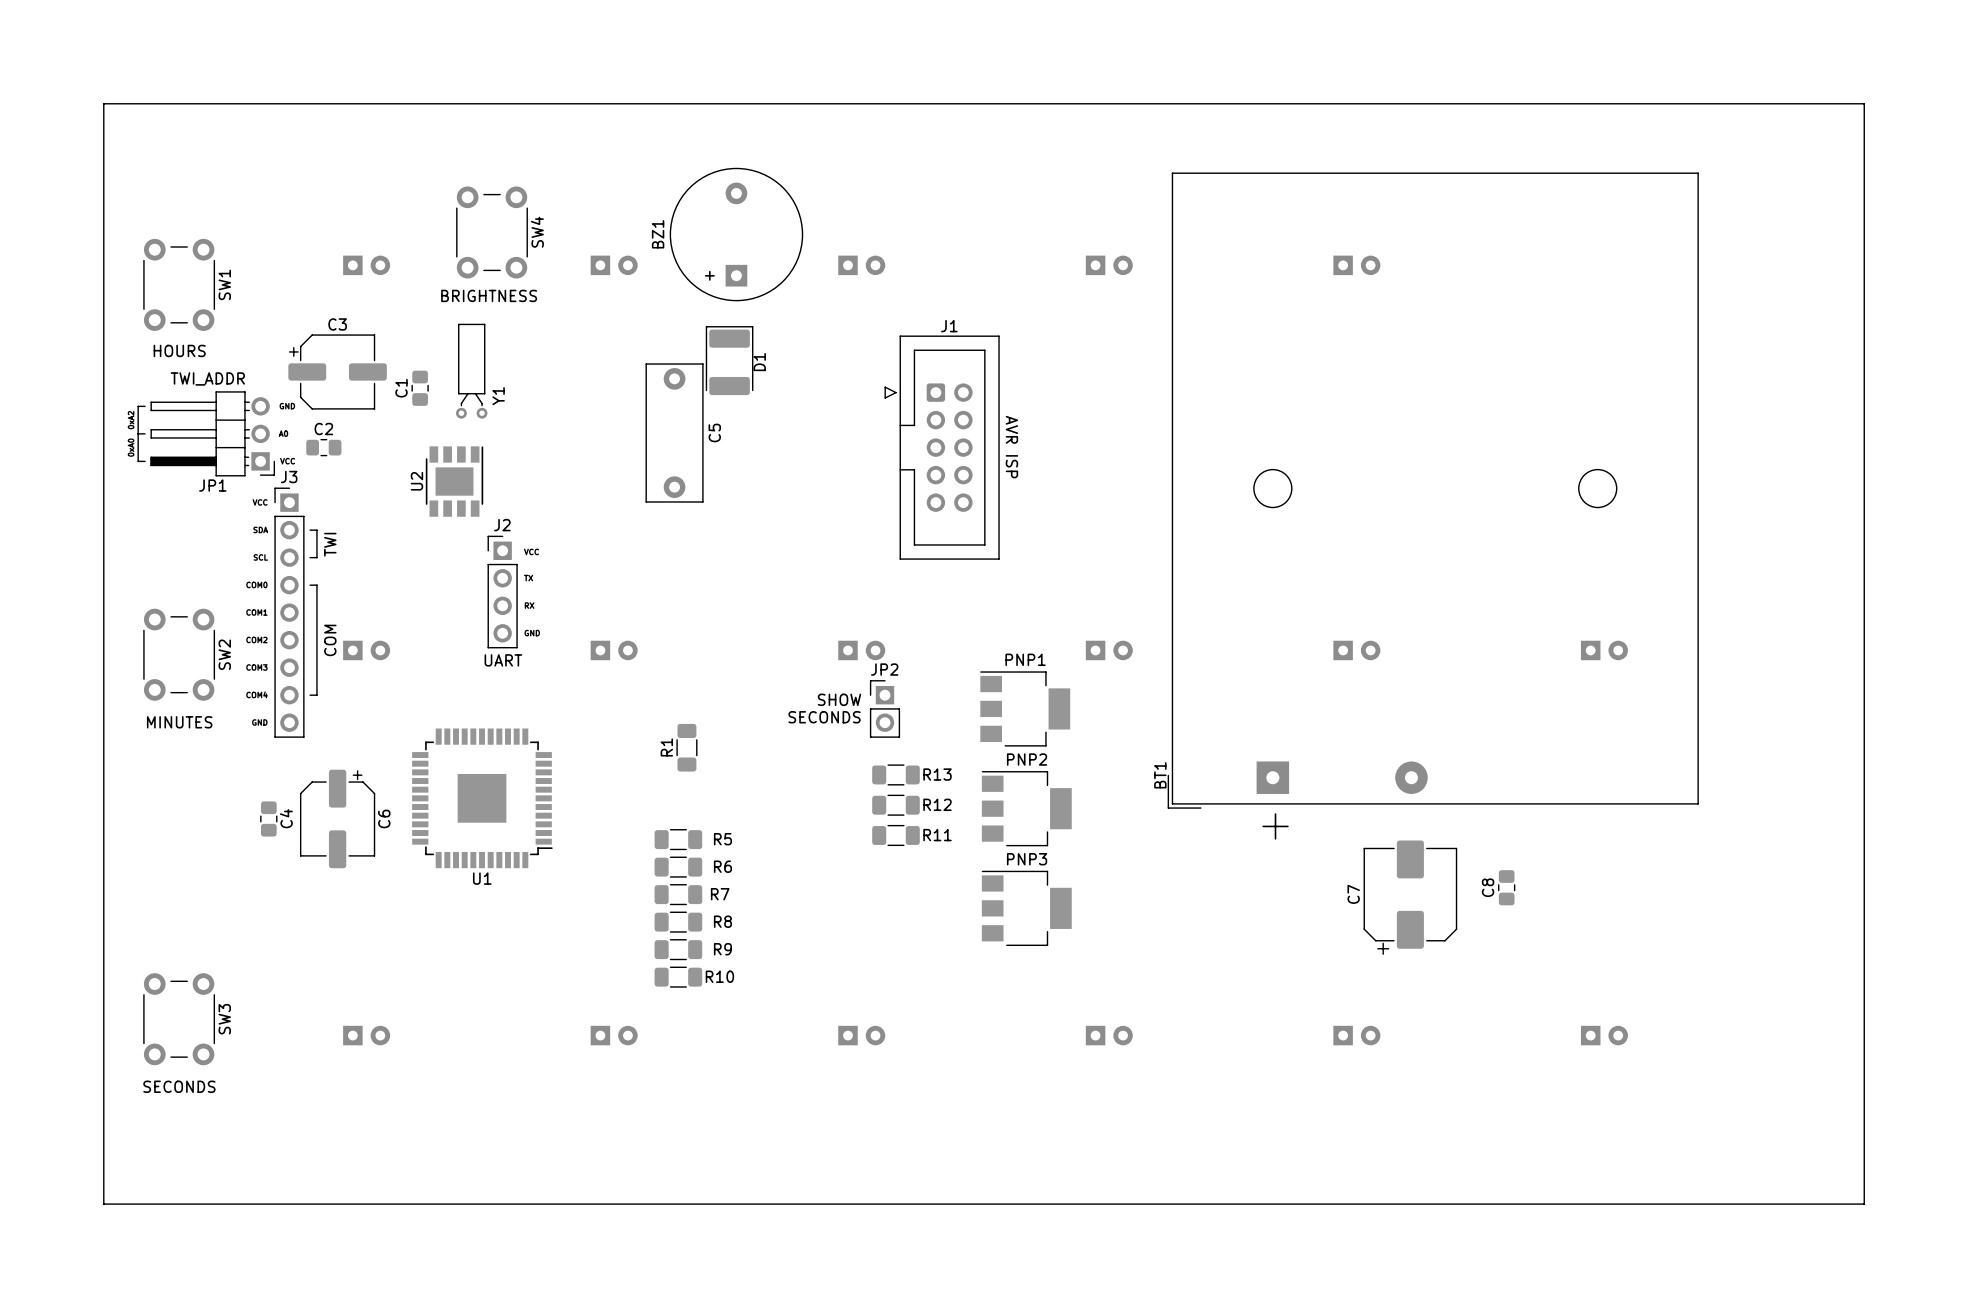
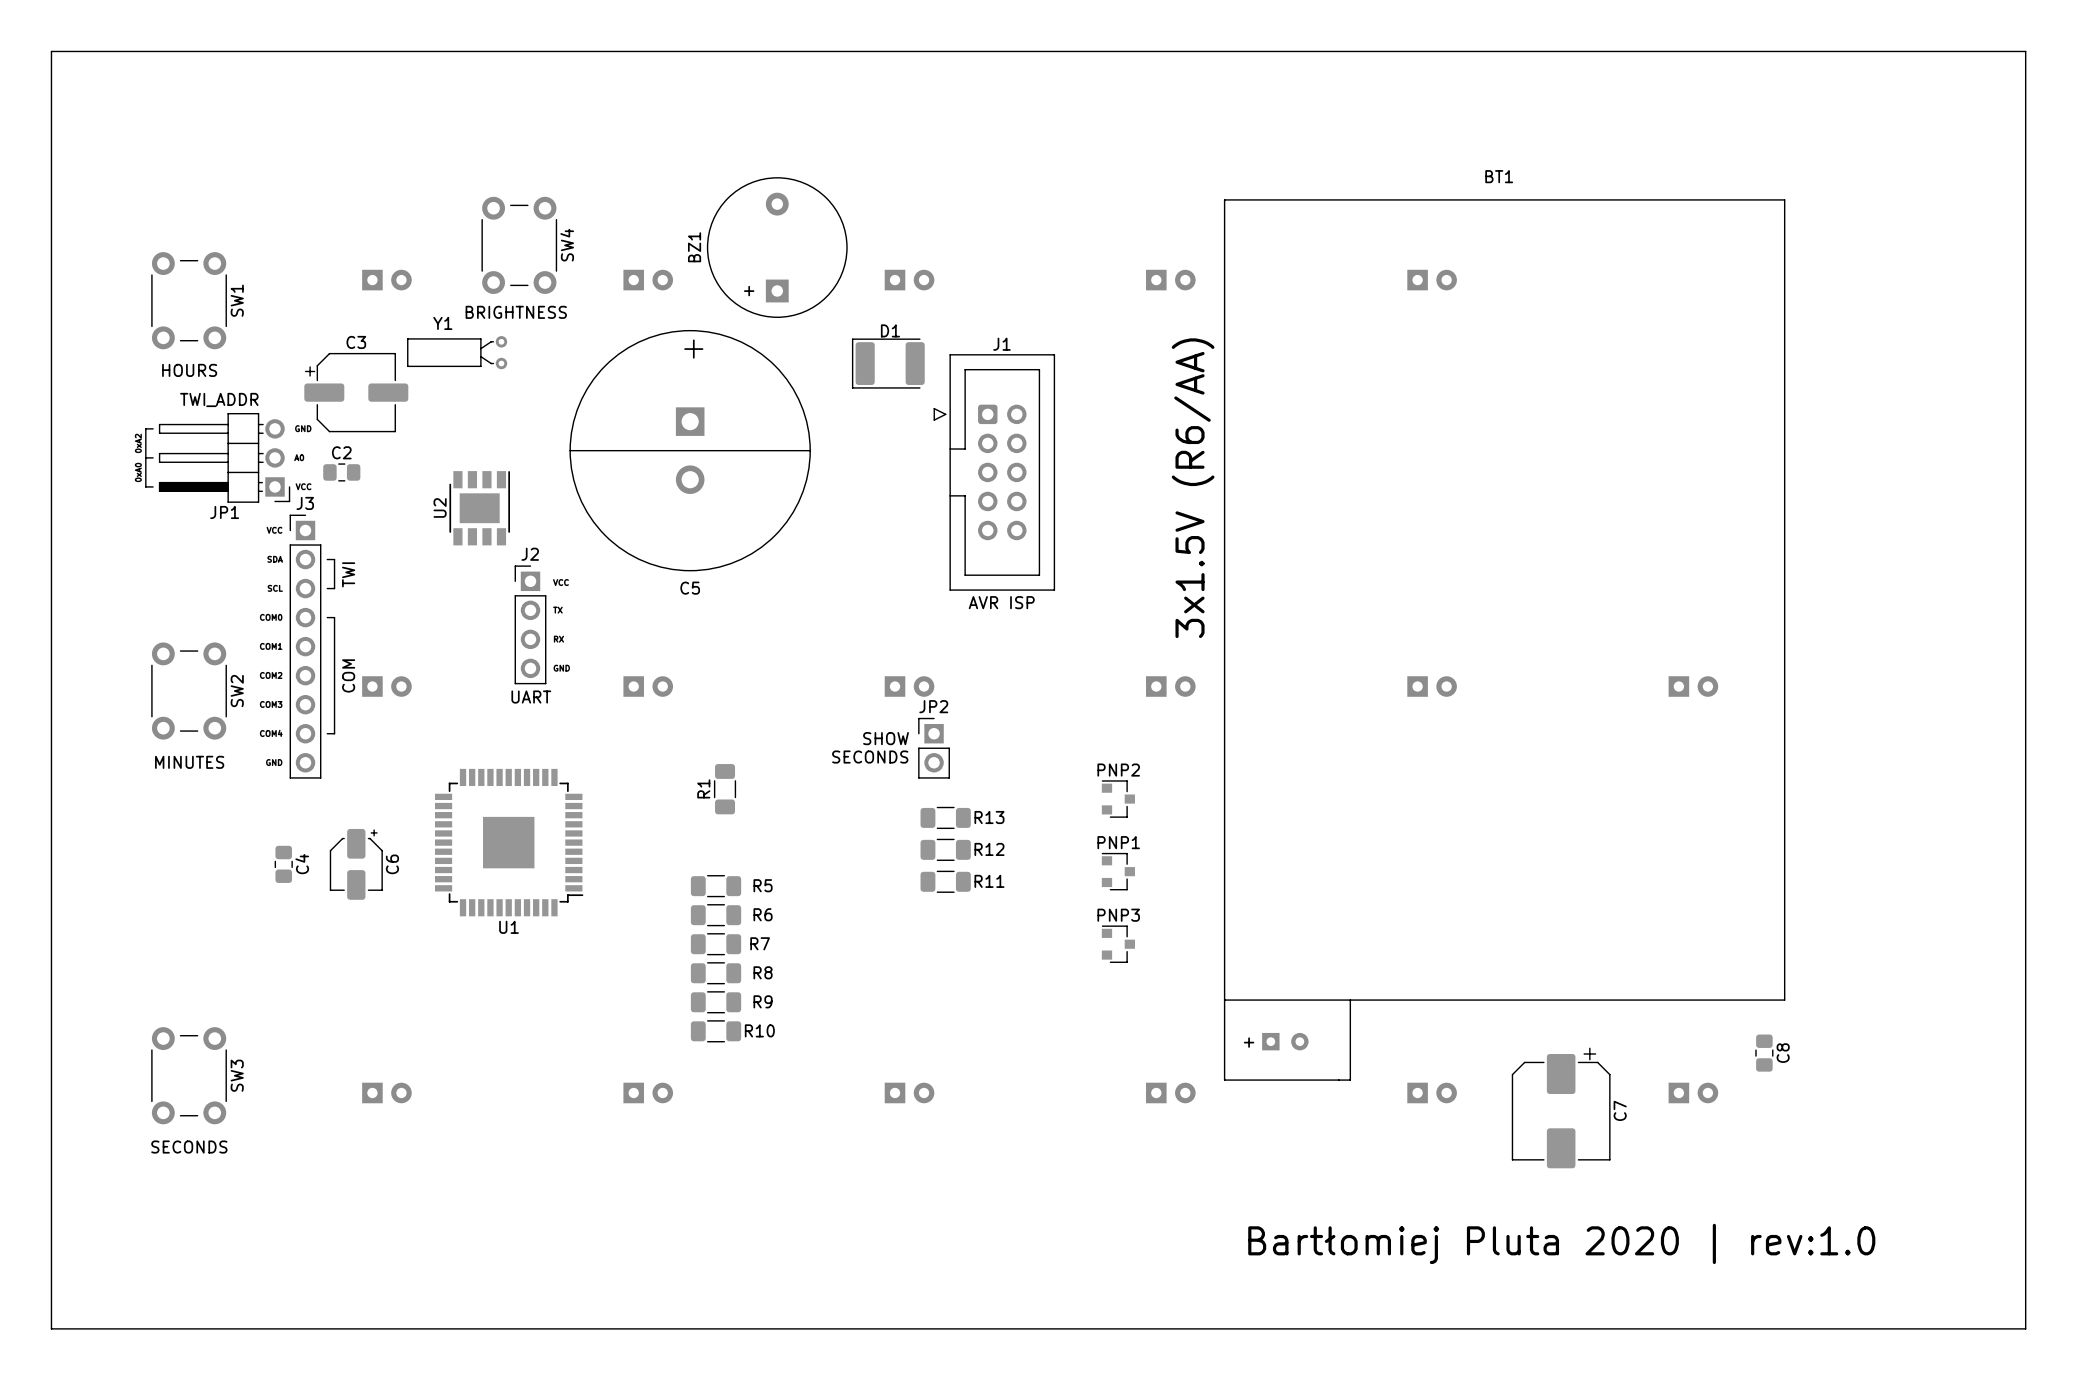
board edge: (103, 103) (1864, 103) (1864, 1204) (103, 1204) (103, 103) -> (51, 51) (51, 1328) (2025, 1328) (2025, 51) (51, 51)
BT1 footprint: [1167, 172, 1699, 809] -> [1223, 199, 1786, 1081]
D1 rotation: 0° (729, 360) -> 90° counterclockwise (888, 363)
D1 position: (729, 360) -> (888, 363)
C5 footprint: [645, 363, 704, 503] -> [569, 329, 811, 572]
Y1 rotation: 0° (471, 371) -> 90° counterclockwise (457, 352)
C1: (420, 388) -> none
Y1 name position: Y1 (498, 396) -> Y1 (442, 323)
C5 name position: C5 (714, 433) -> C5 (690, 588)
text rotation: 0° (1011, 447) -> 90° counterclockwise (1001, 602)
text position: AVR ISP (1011, 447) -> AVR ISP (1001, 602)
text: none -> 3x1.5V (R6/AA) (1193, 488)
PNP1 footprint: [980, 671, 1071, 747] -> [1101, 852, 1135, 891]
C6 footprint: [300, 769, 376, 869] -> [329, 828, 383, 900]
PNP2 footprint: [981, 771, 1072, 847] -> [1101, 780, 1135, 818]
BT1 name position: BT1 (1160, 775) -> BT1 (1499, 176)
PNP3 footprint: [981, 870, 1072, 946] -> [1101, 925, 1135, 963]
C8 name position: C8 (1488, 887) -> C8 (1783, 1053)
C8 position: (1506, 887) -> (1764, 1053)
C7 rotation: 0° (1410, 897) -> 180° (1561, 1107)
C7 position: (1410, 897) -> (1561, 1107)
text: none -> Bartłomiej Pluta 2020 | rev:1.0 (1561, 1243)

